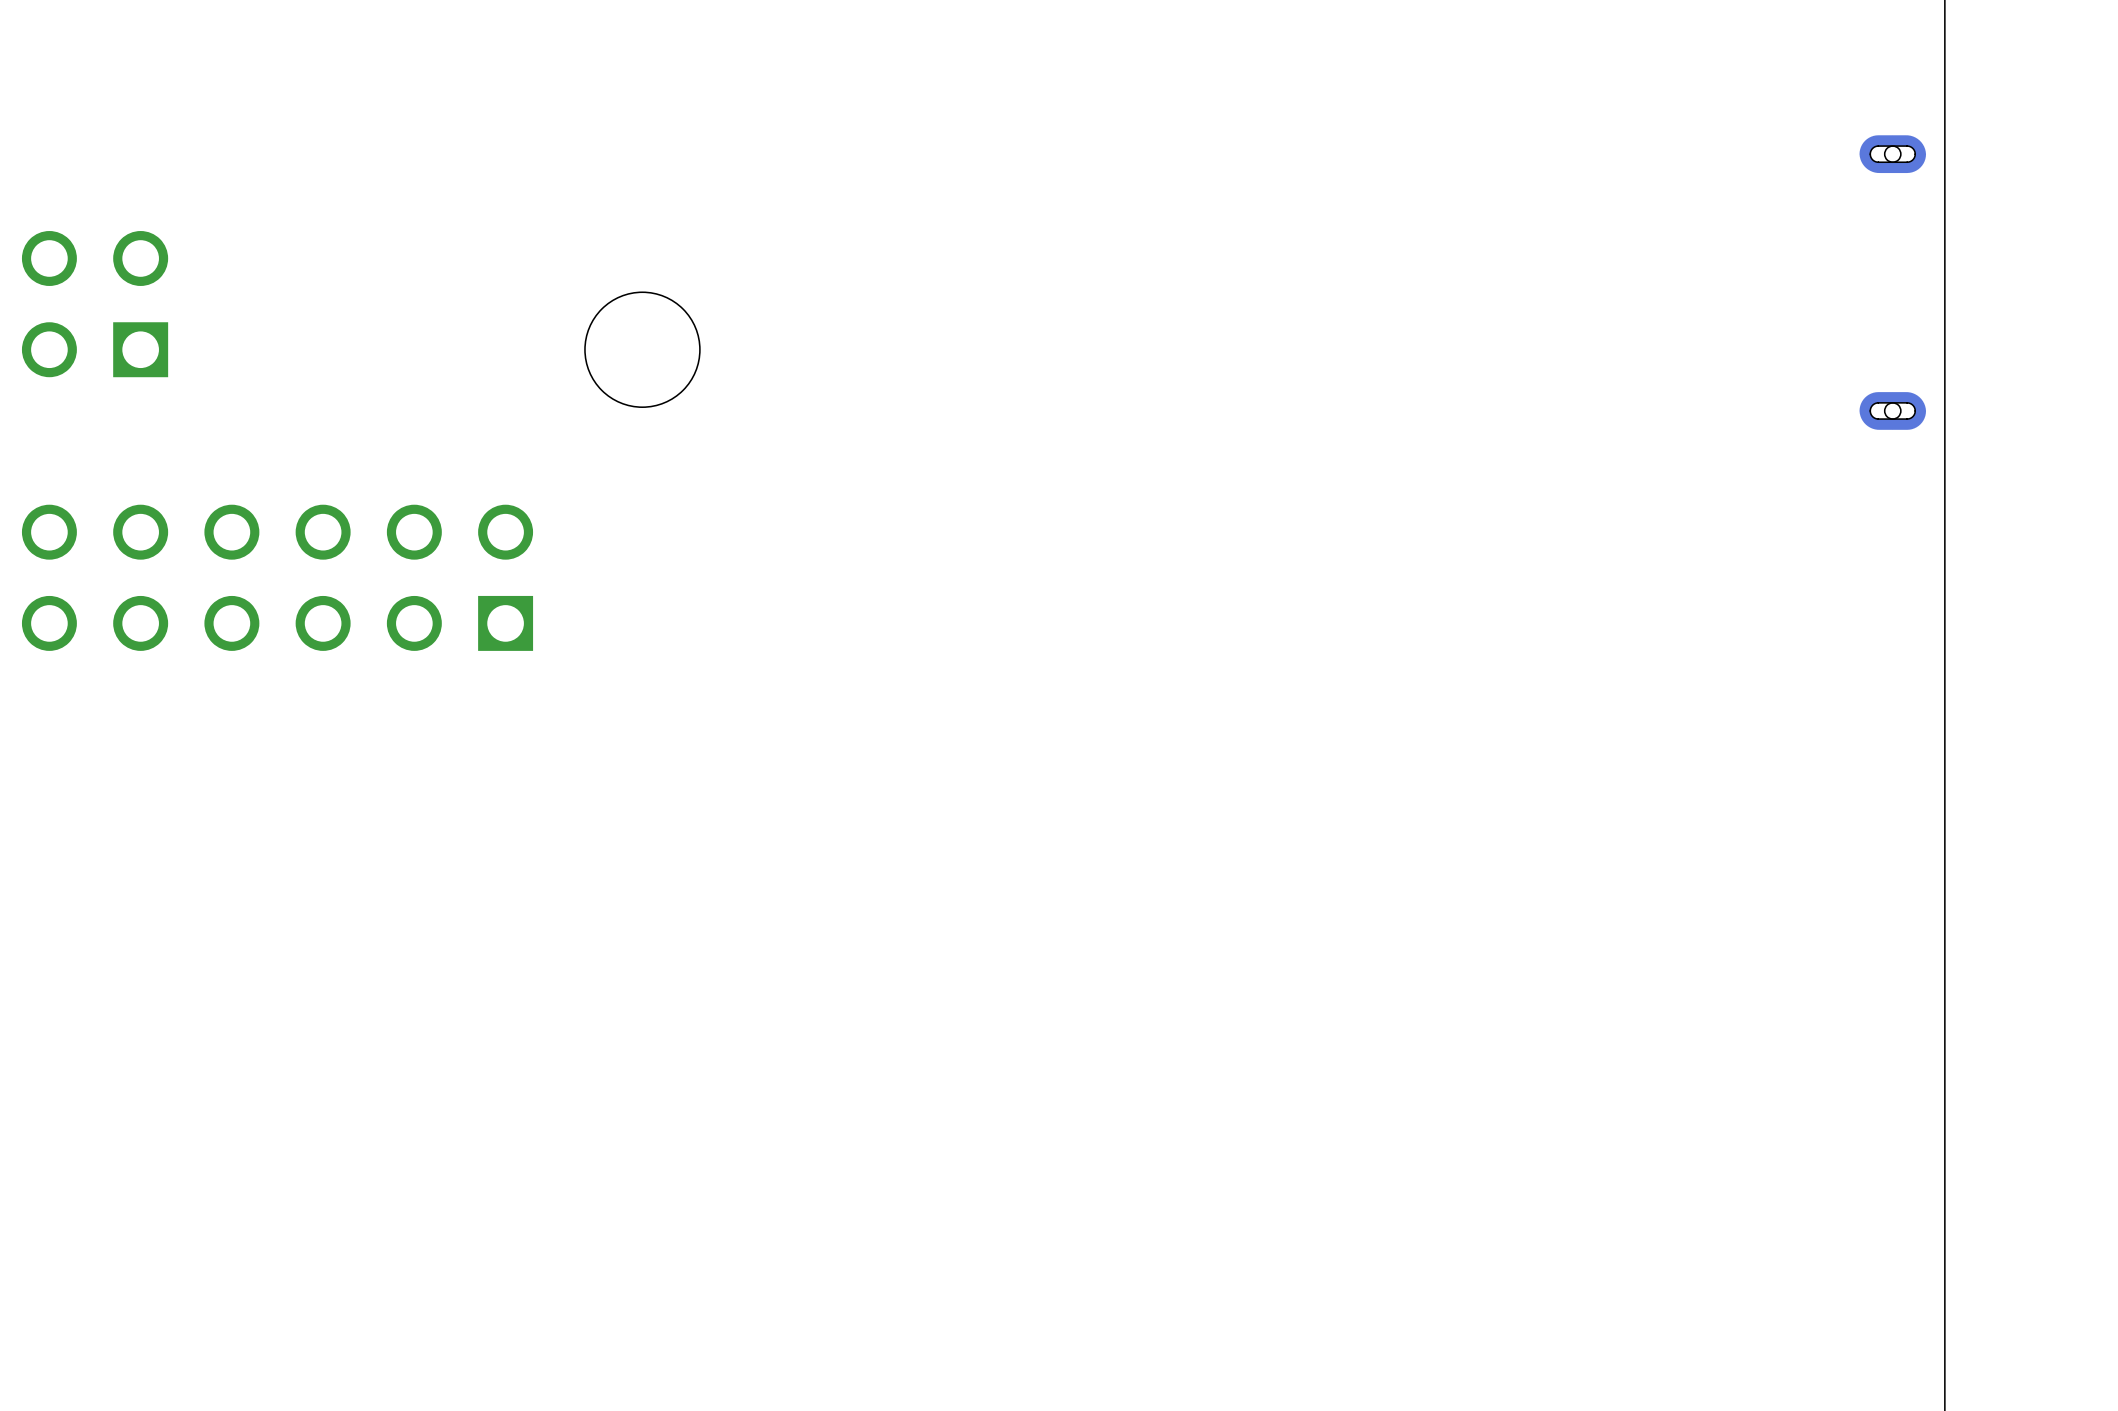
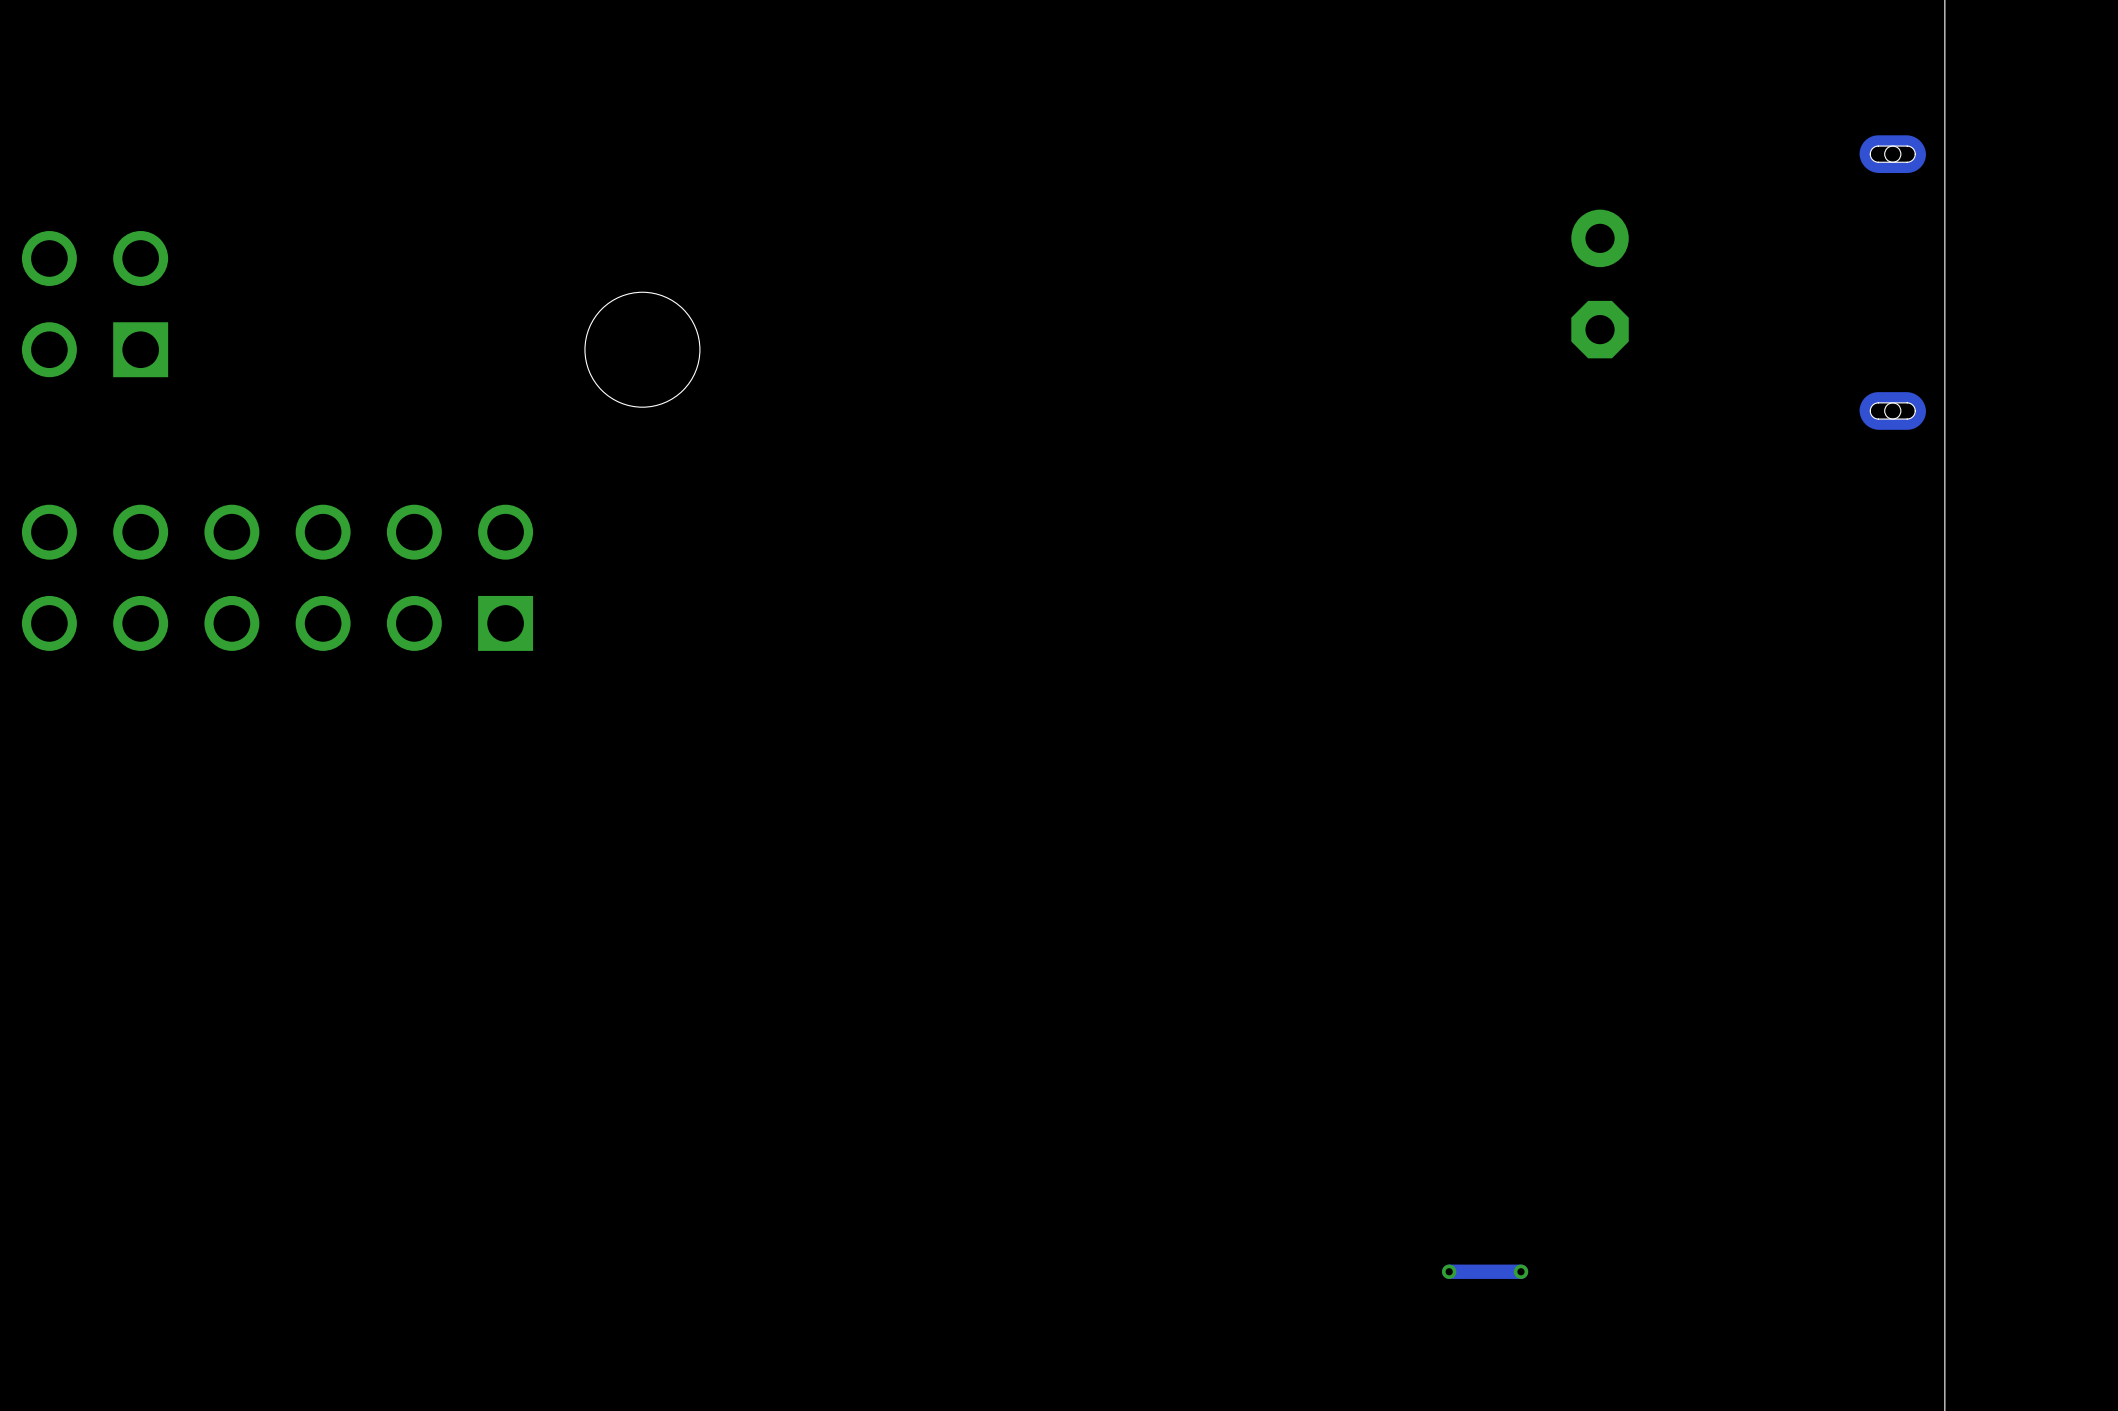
part: none -> (1600, 283)
via: none -> (1449, 1271)
track: none -> (1521, 1271) (1449, 1271)
via: none -> (1521, 1271)

